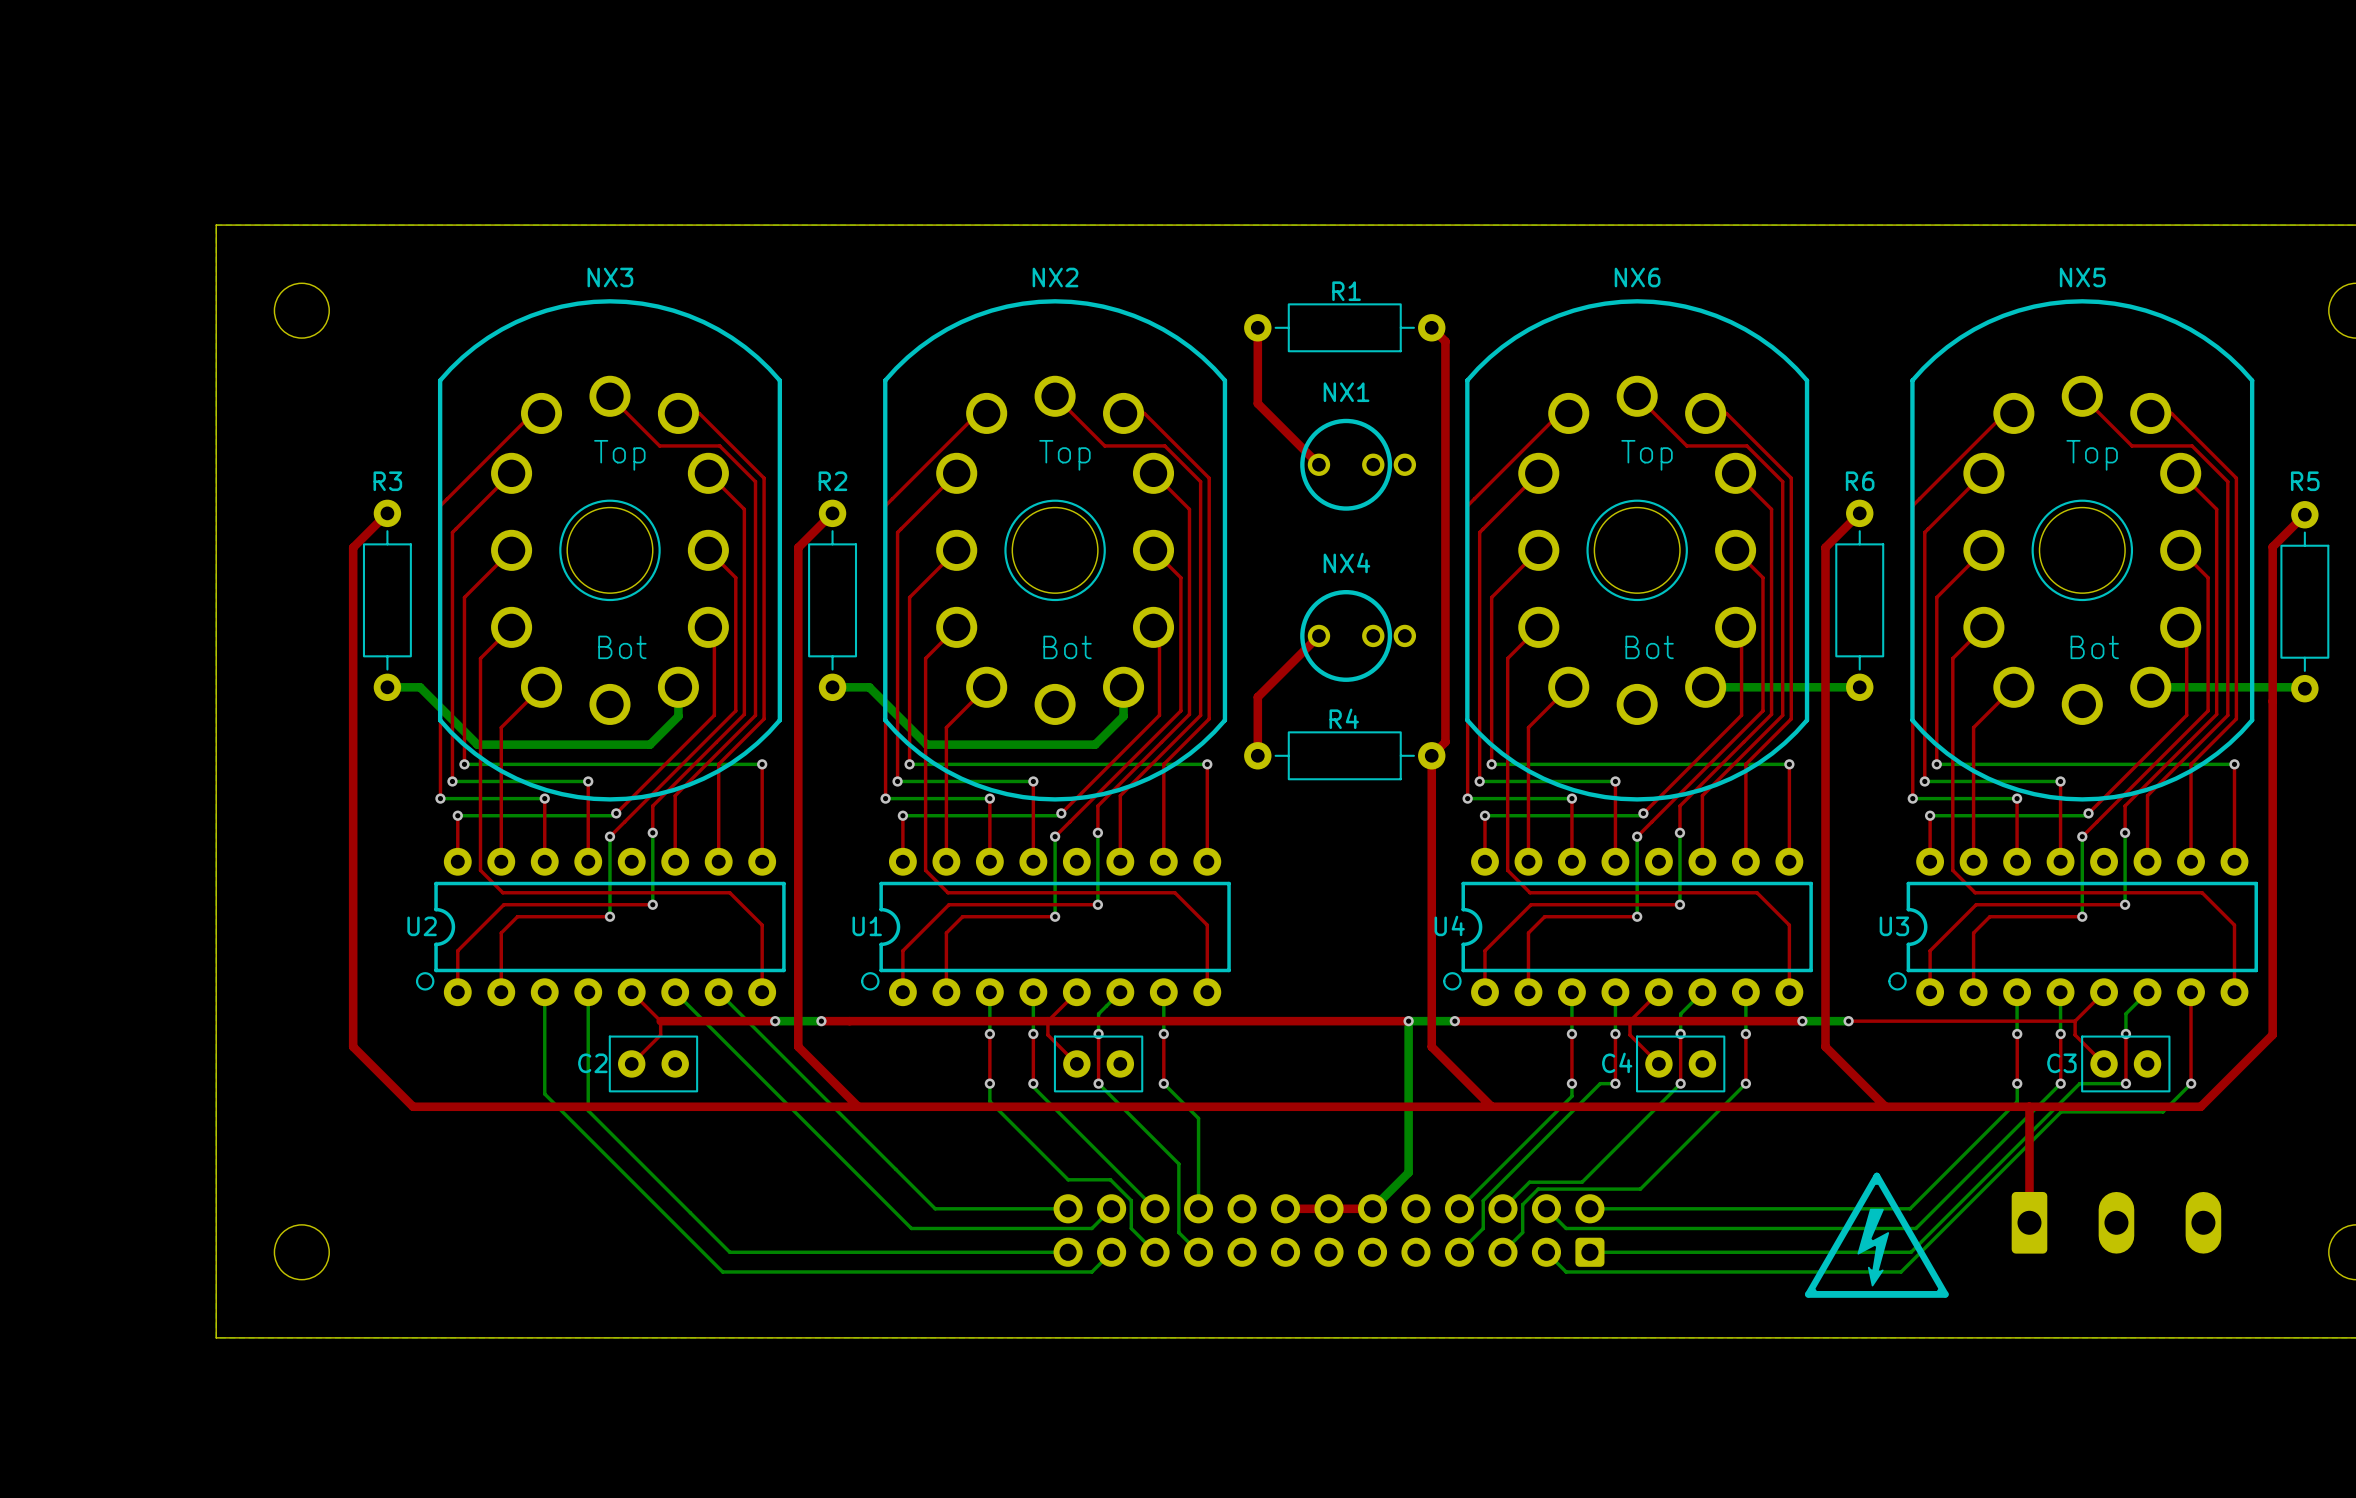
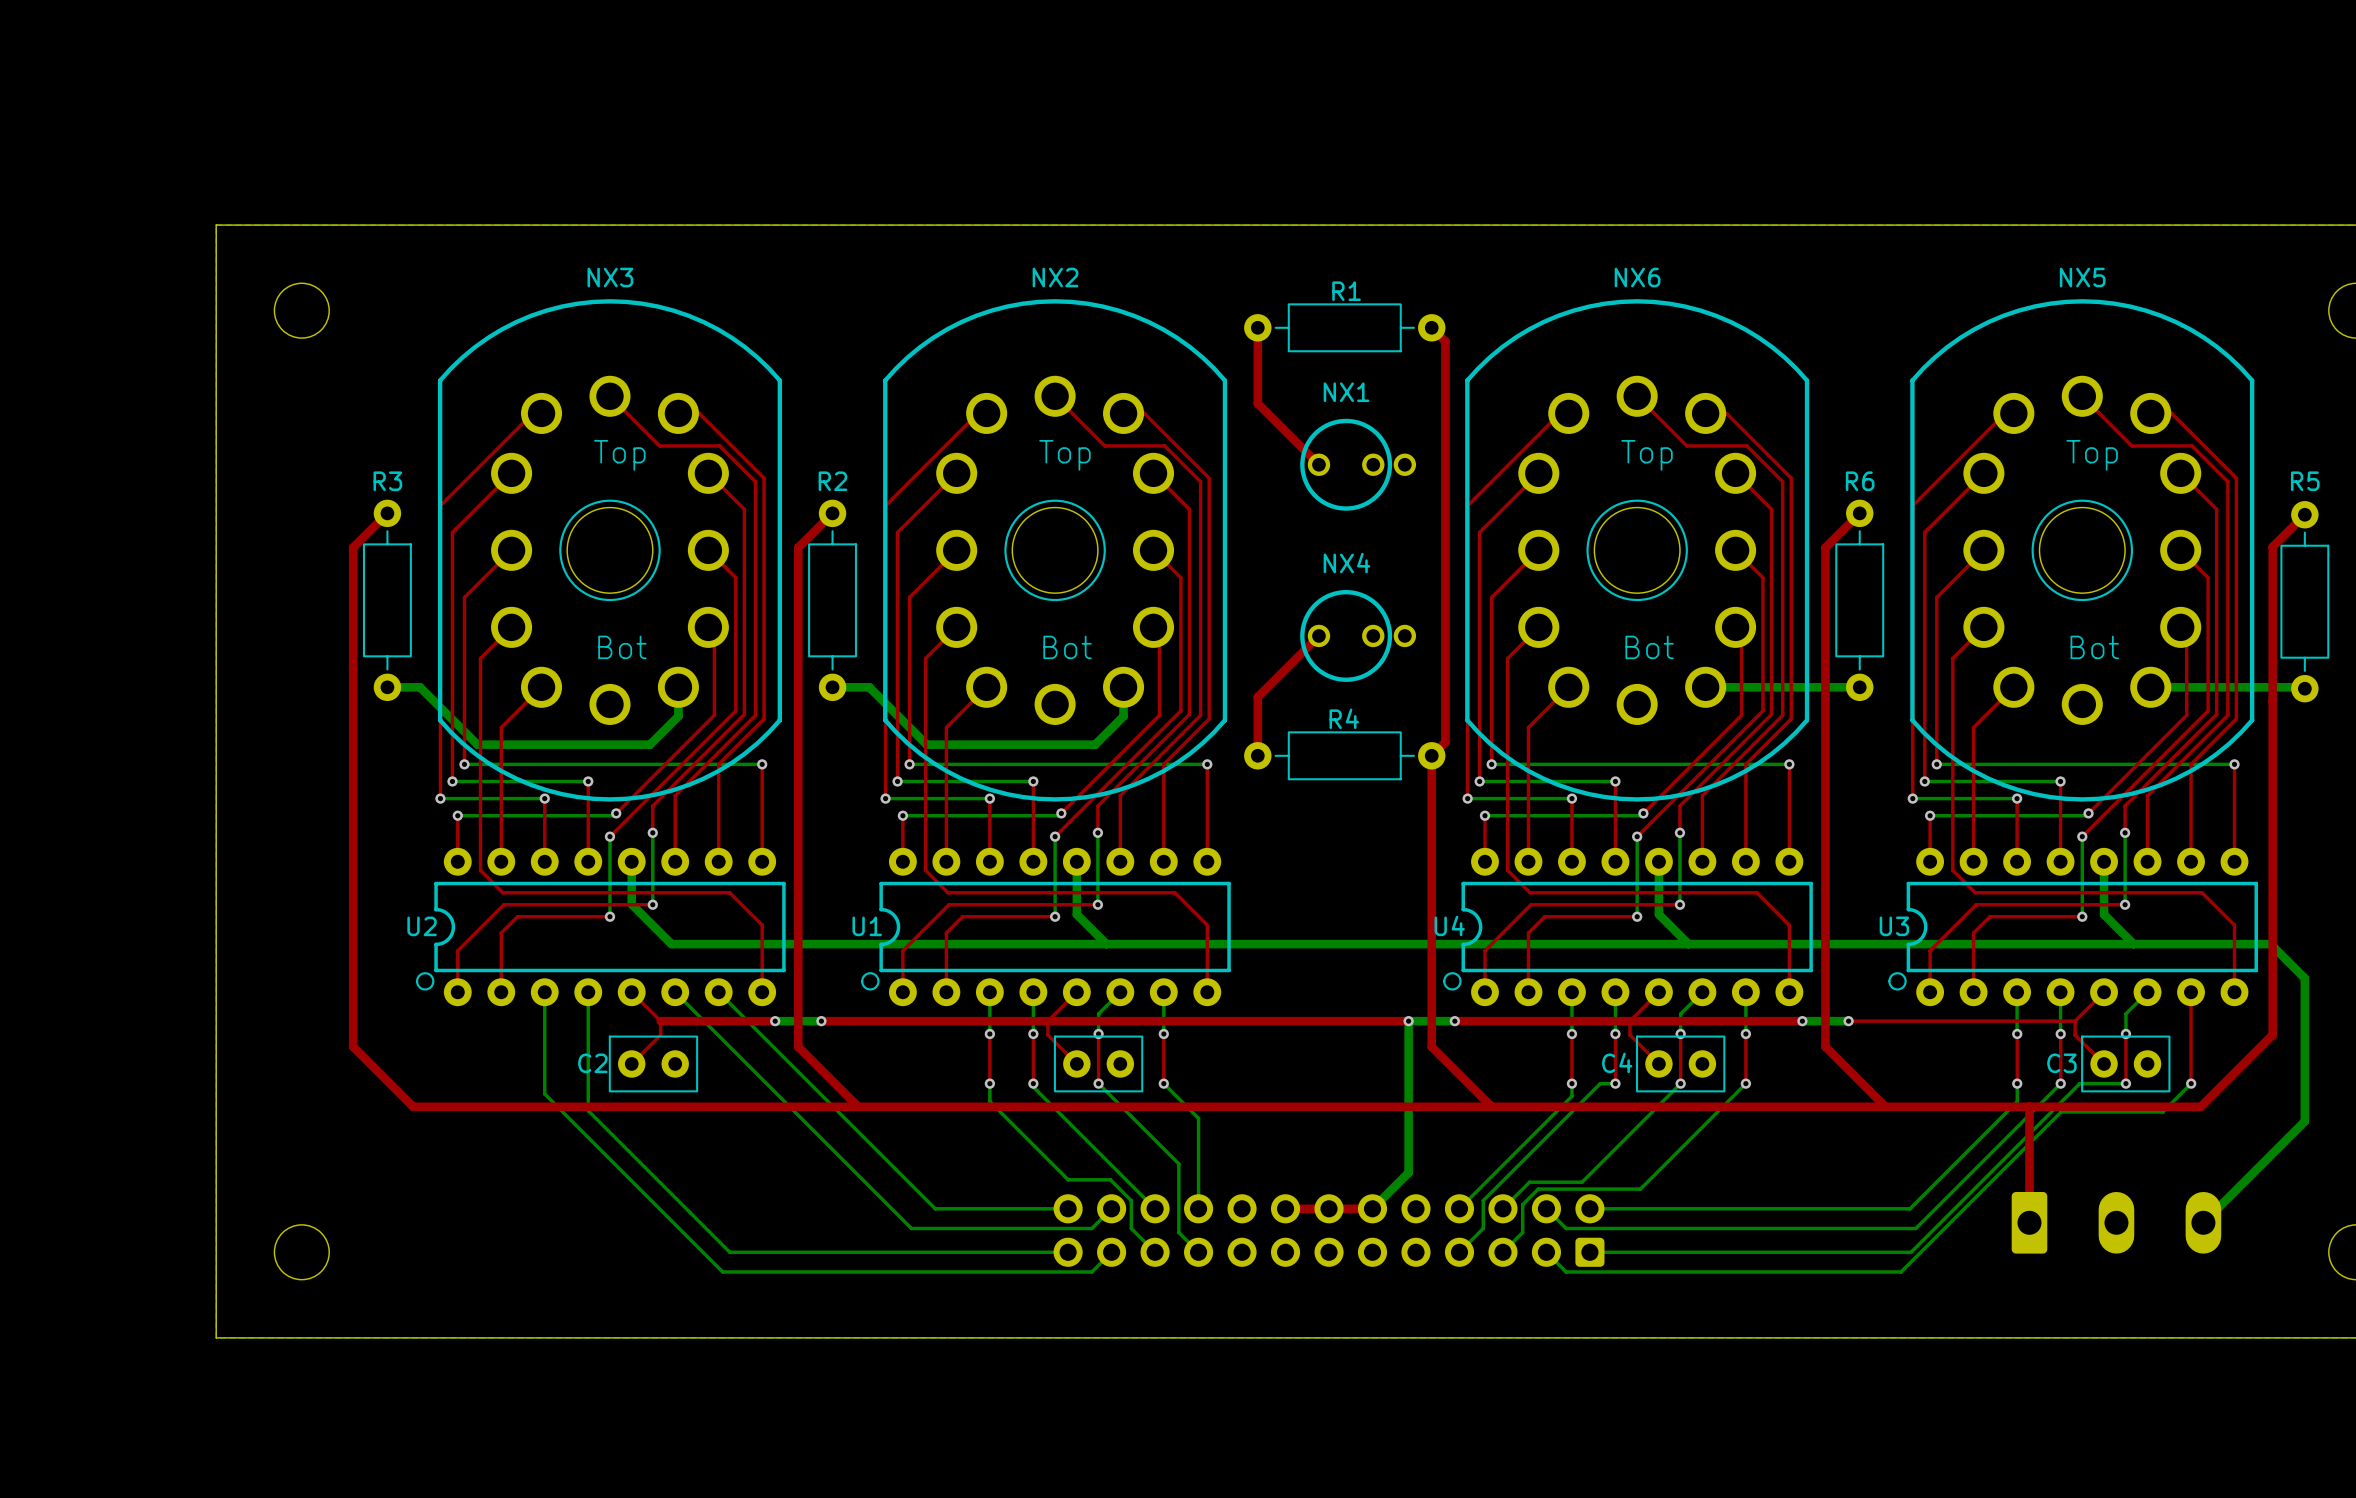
bottom track: none -> (631, 861) (631, 904) (671, 944) (2270, 944) (2304, 978) (2304, 1121) (2203, 1222)
bottom track: none -> (1076, 861) (1076, 914) (1106, 944)
bottom track: none -> (1658, 861) (1658, 914) (1688, 944)
bottom track: none -> (2104, 861) (2104, 914) (2133, 944)
drawing: [1804, 1172, 1949, 1298] -> none

